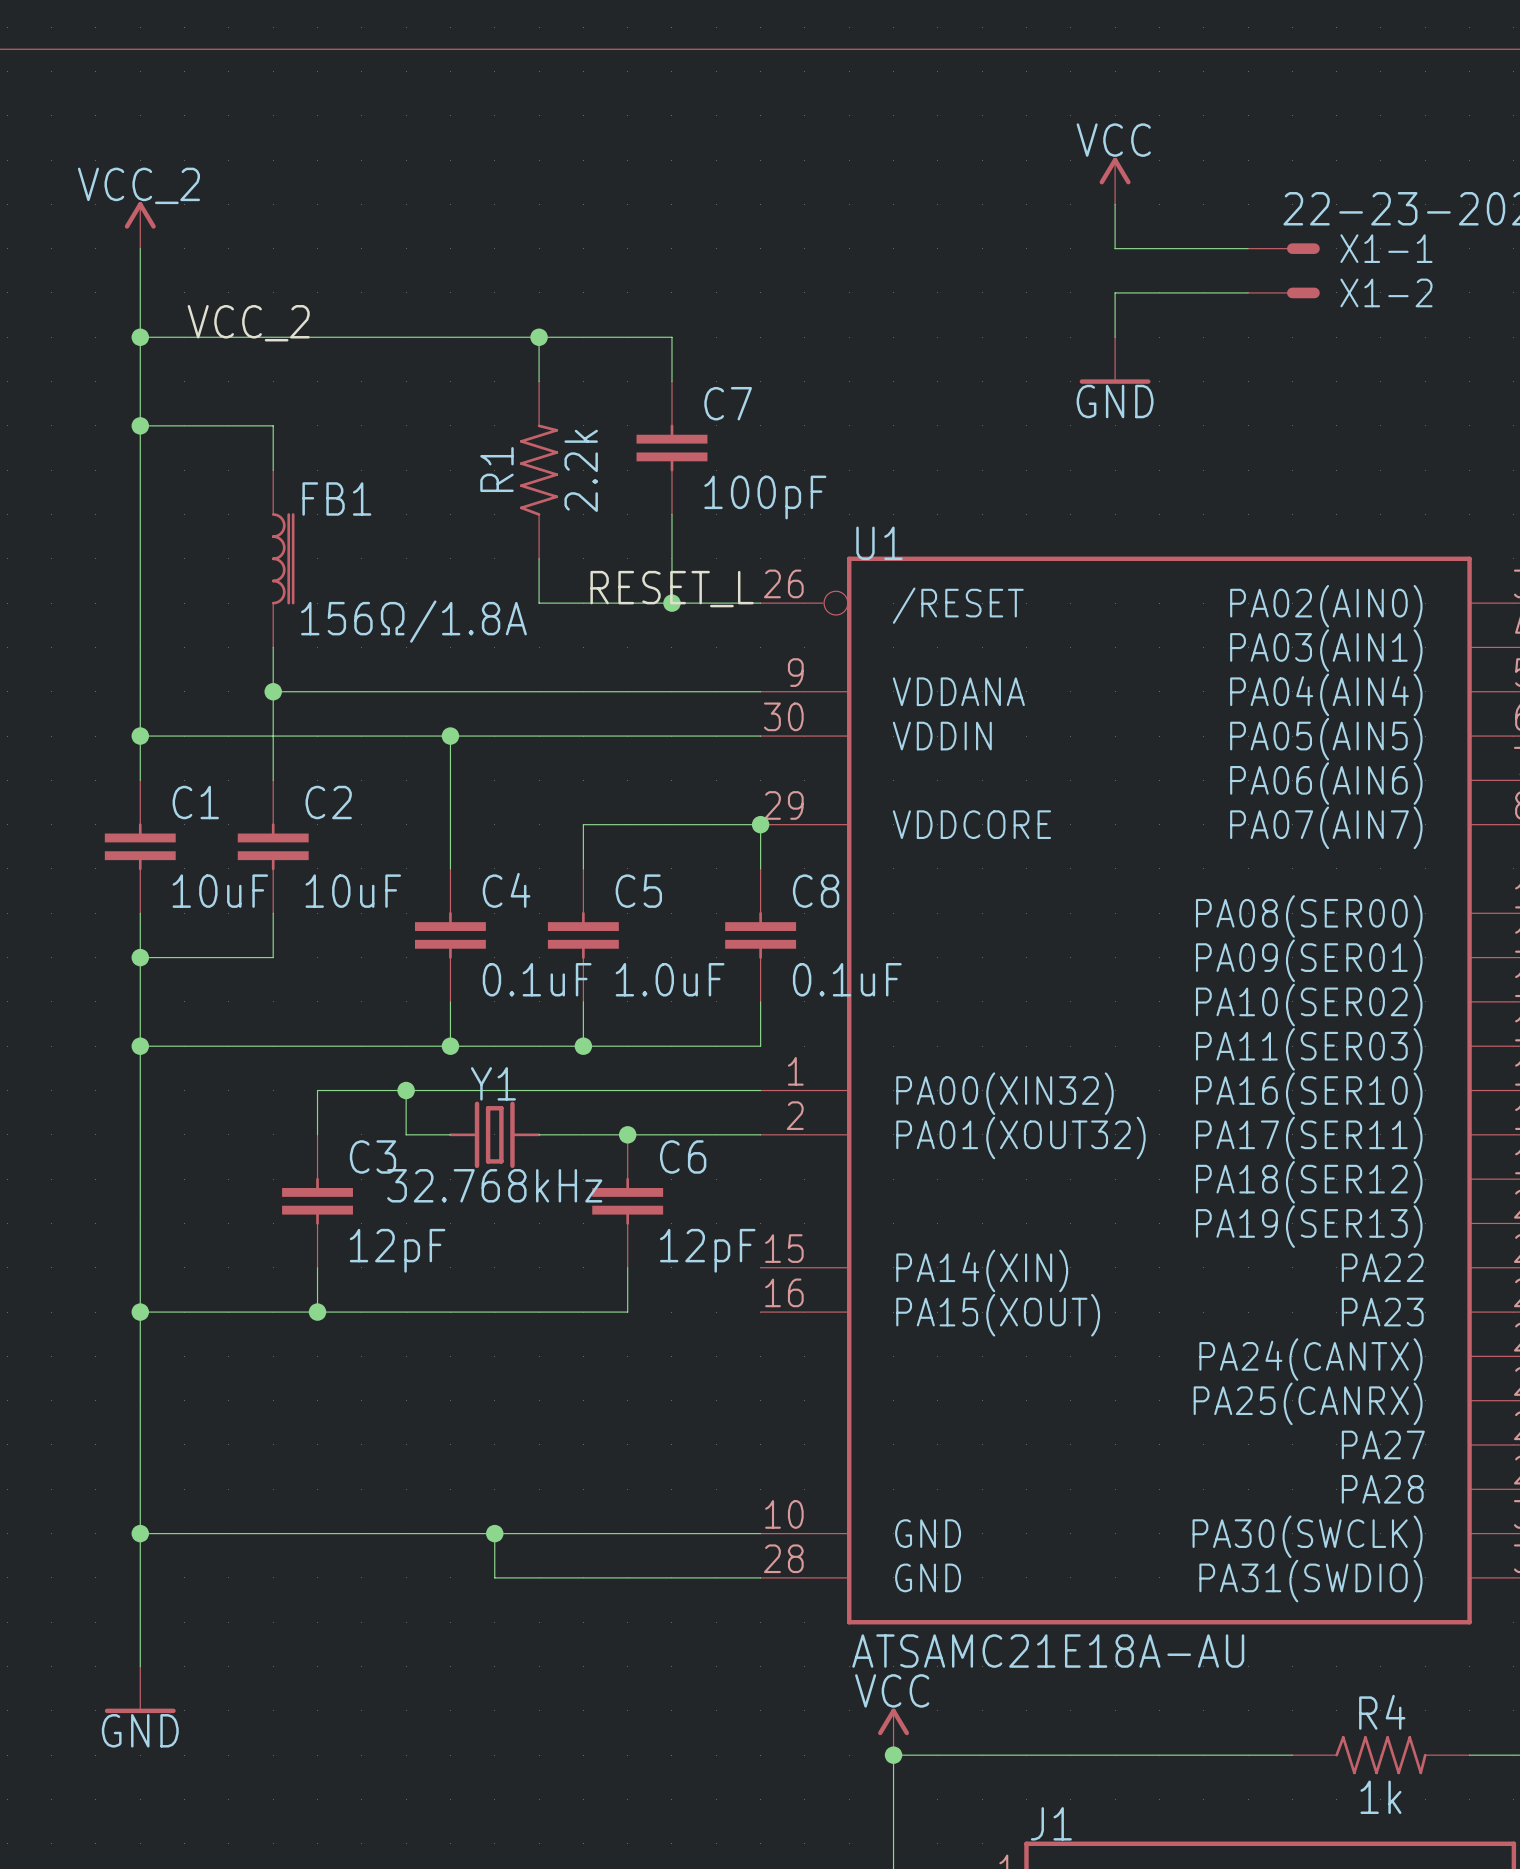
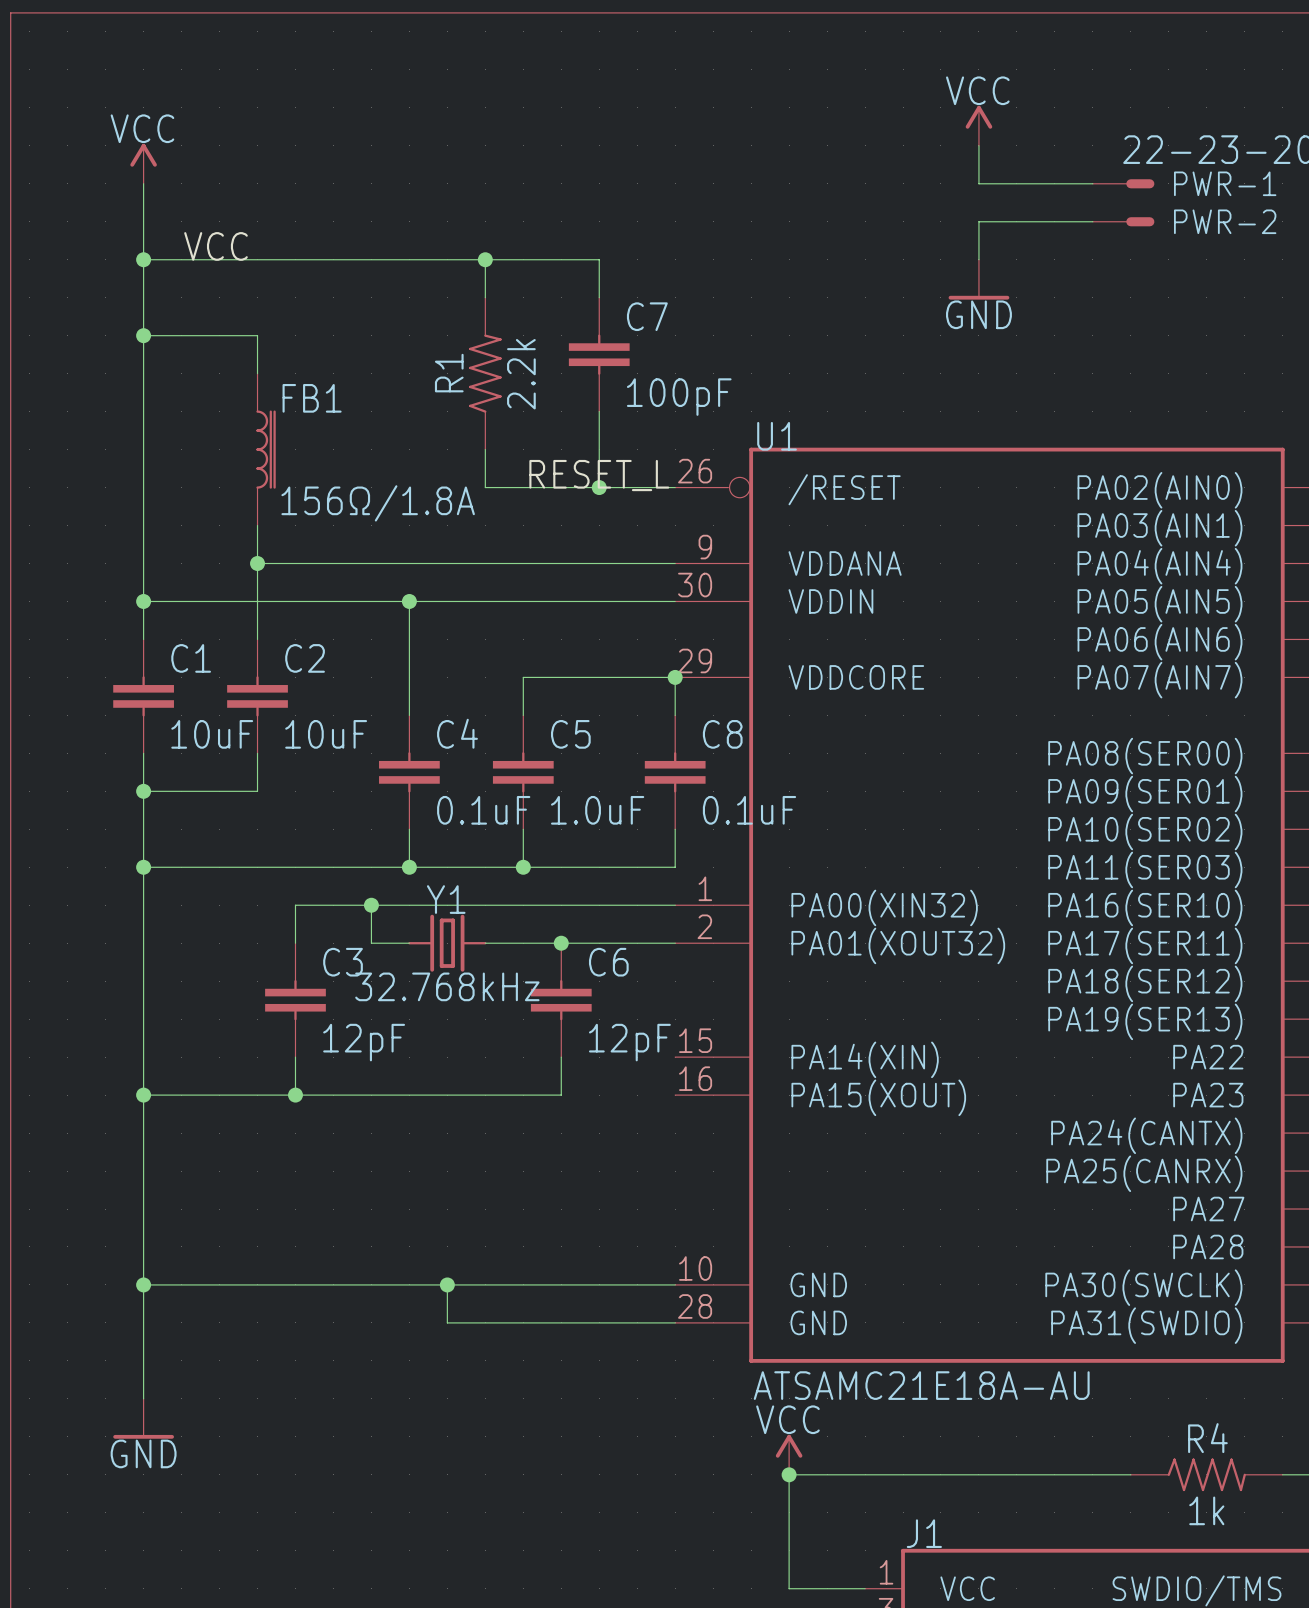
power symbol: VCC_2 (140, 225) -> VCC (143, 163)
X1-1 name: X1-1 (1386, 248) -> PWR-1 (1225, 183)
X1-2 name: X1-2 (1386, 292) -> PWR-2 (1225, 221)
label: VCC_2 (248, 323) -> VCC (216, 246)

